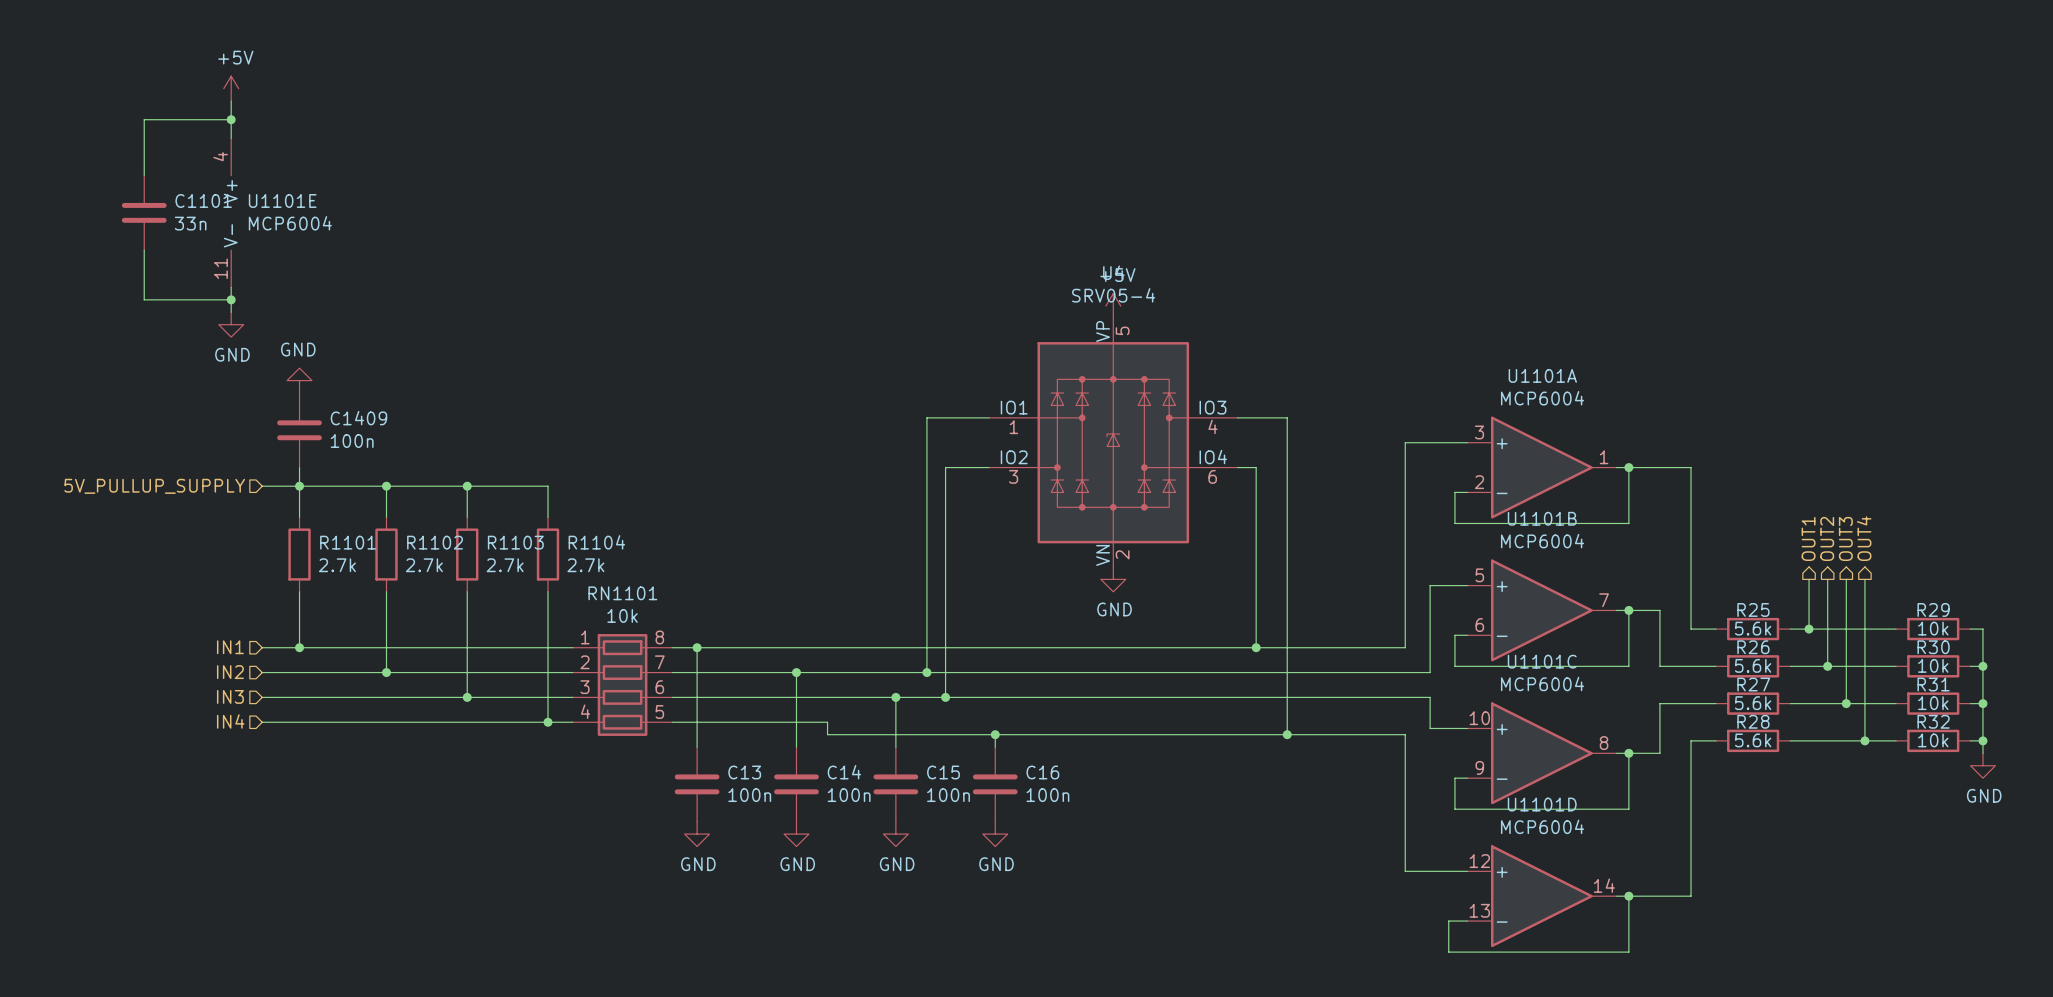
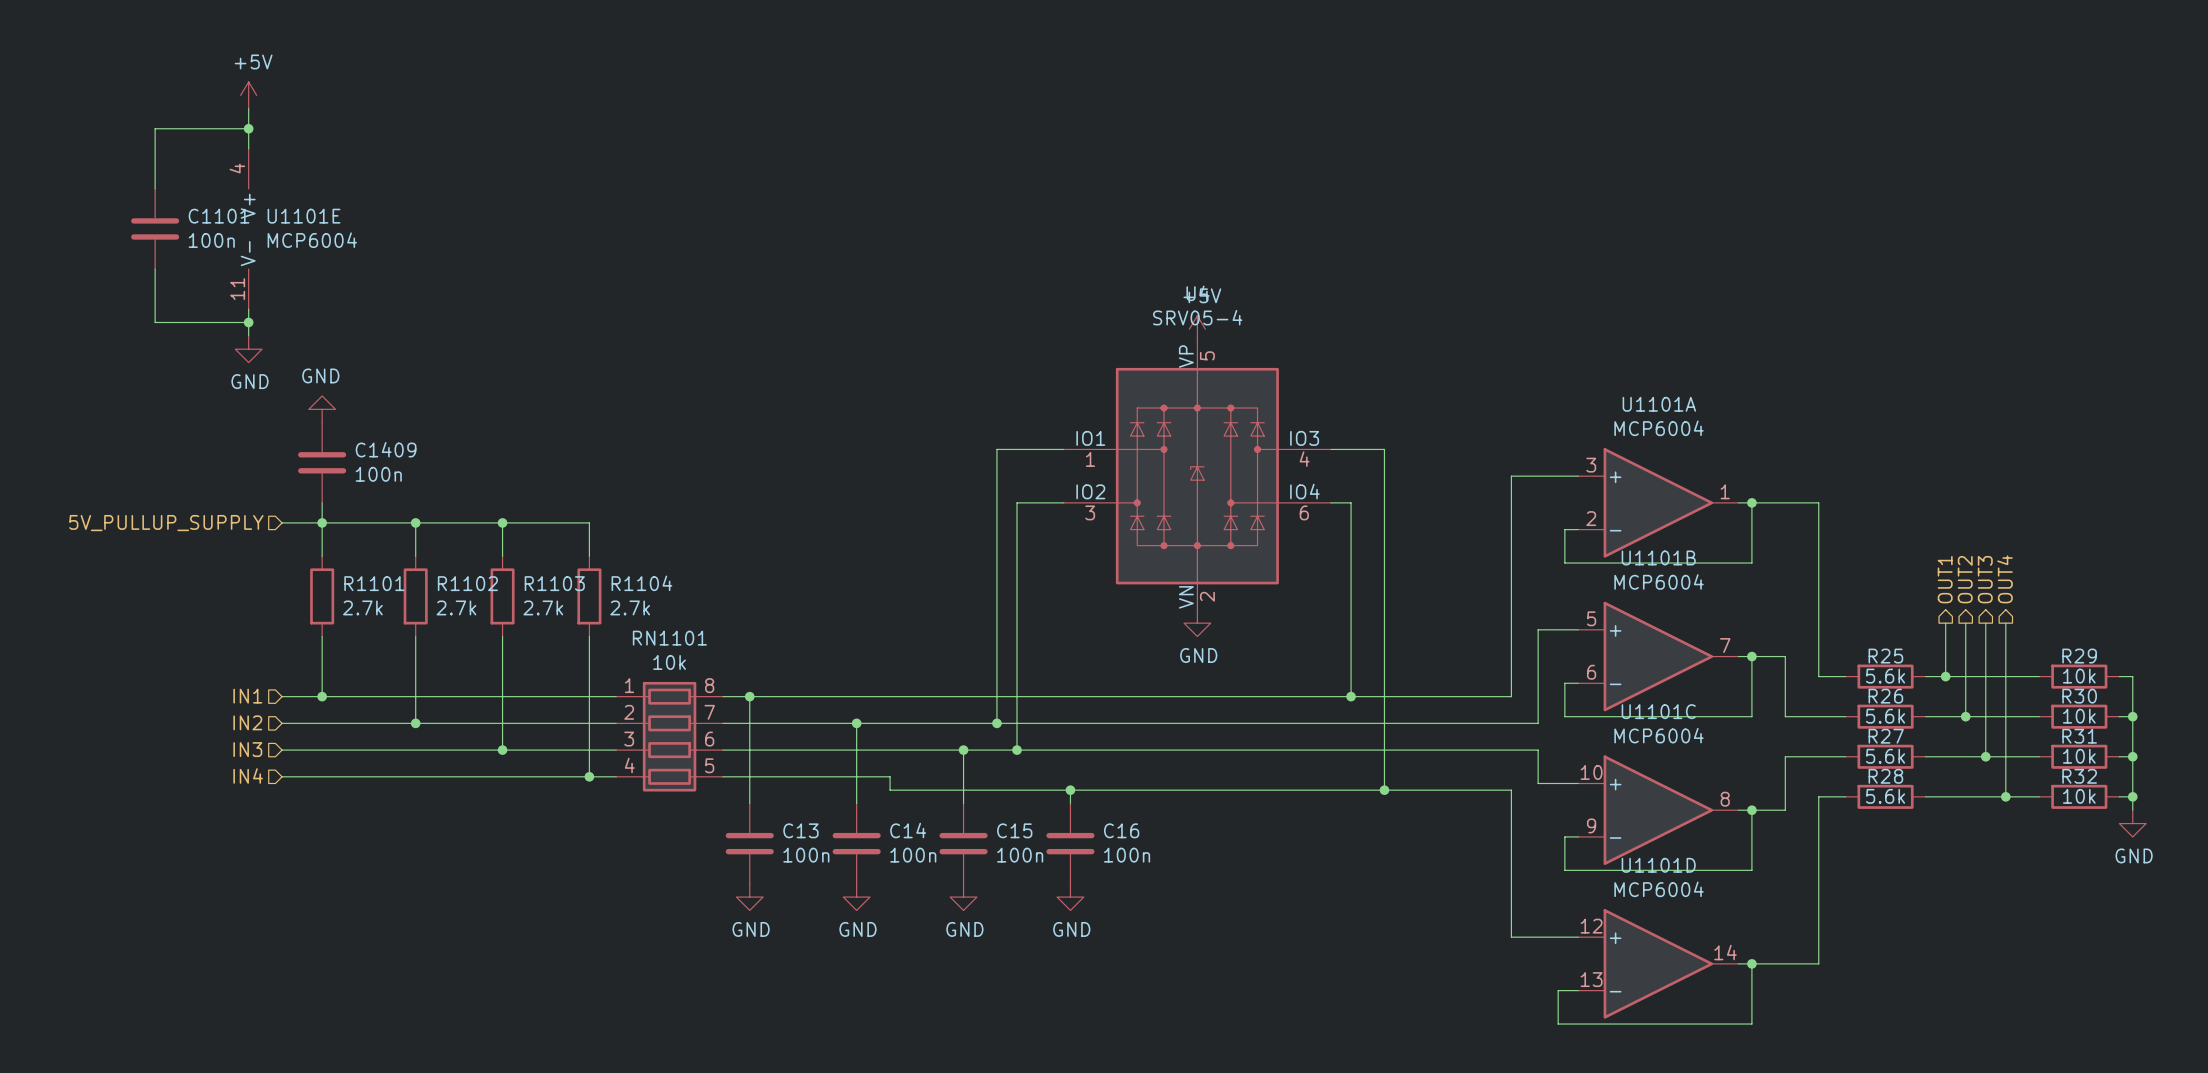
C1101 value: 33n (190, 223) -> 100n (211, 240)

